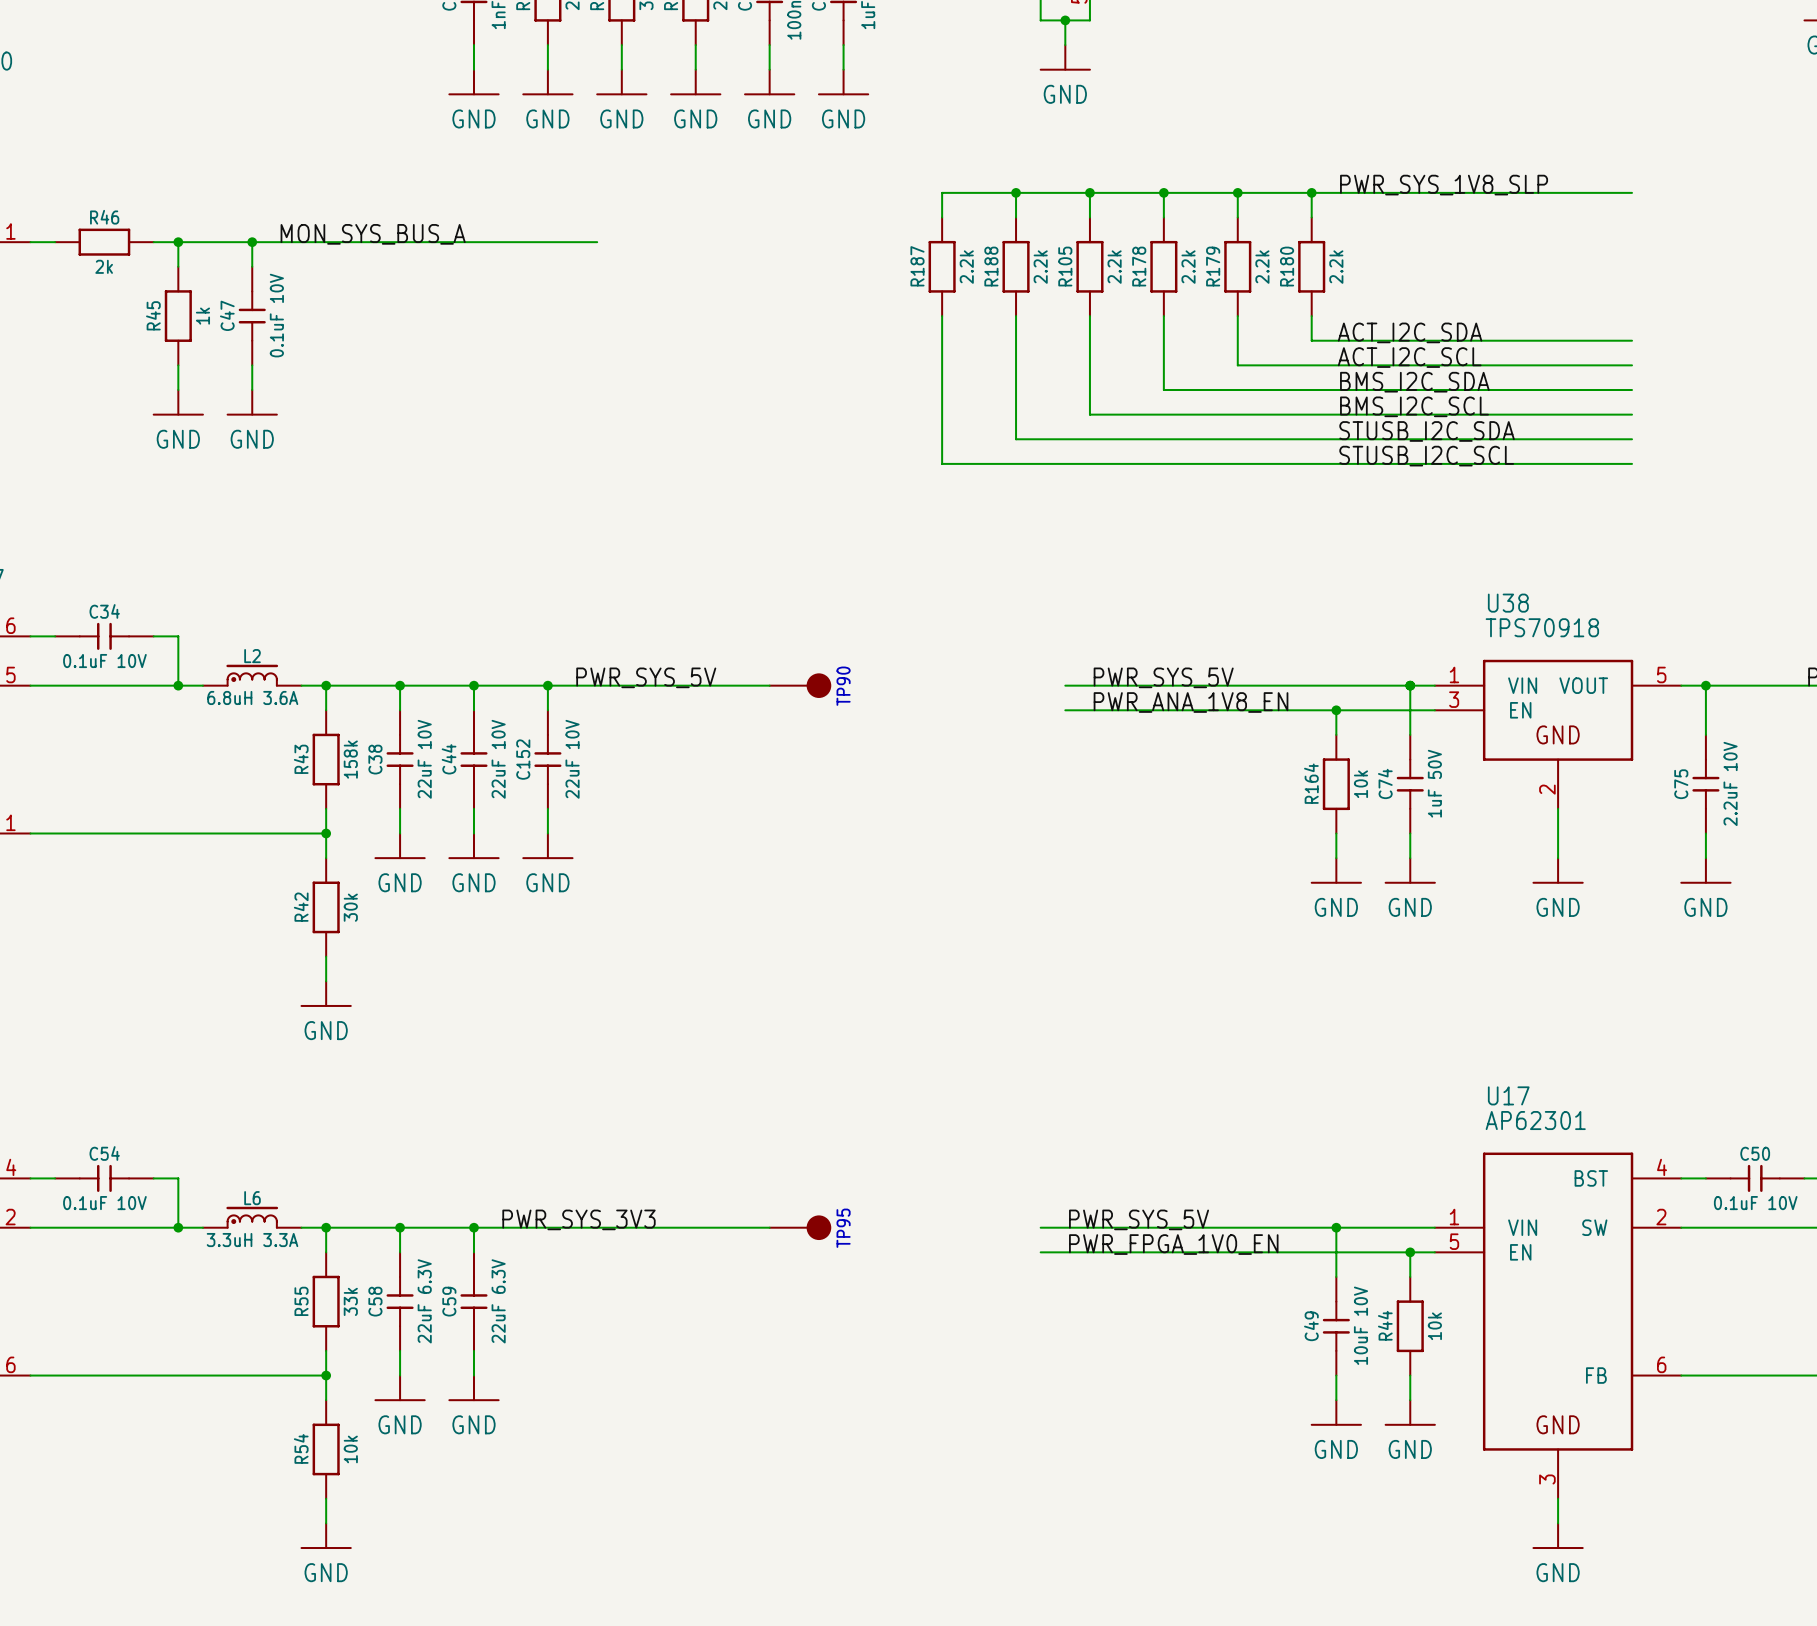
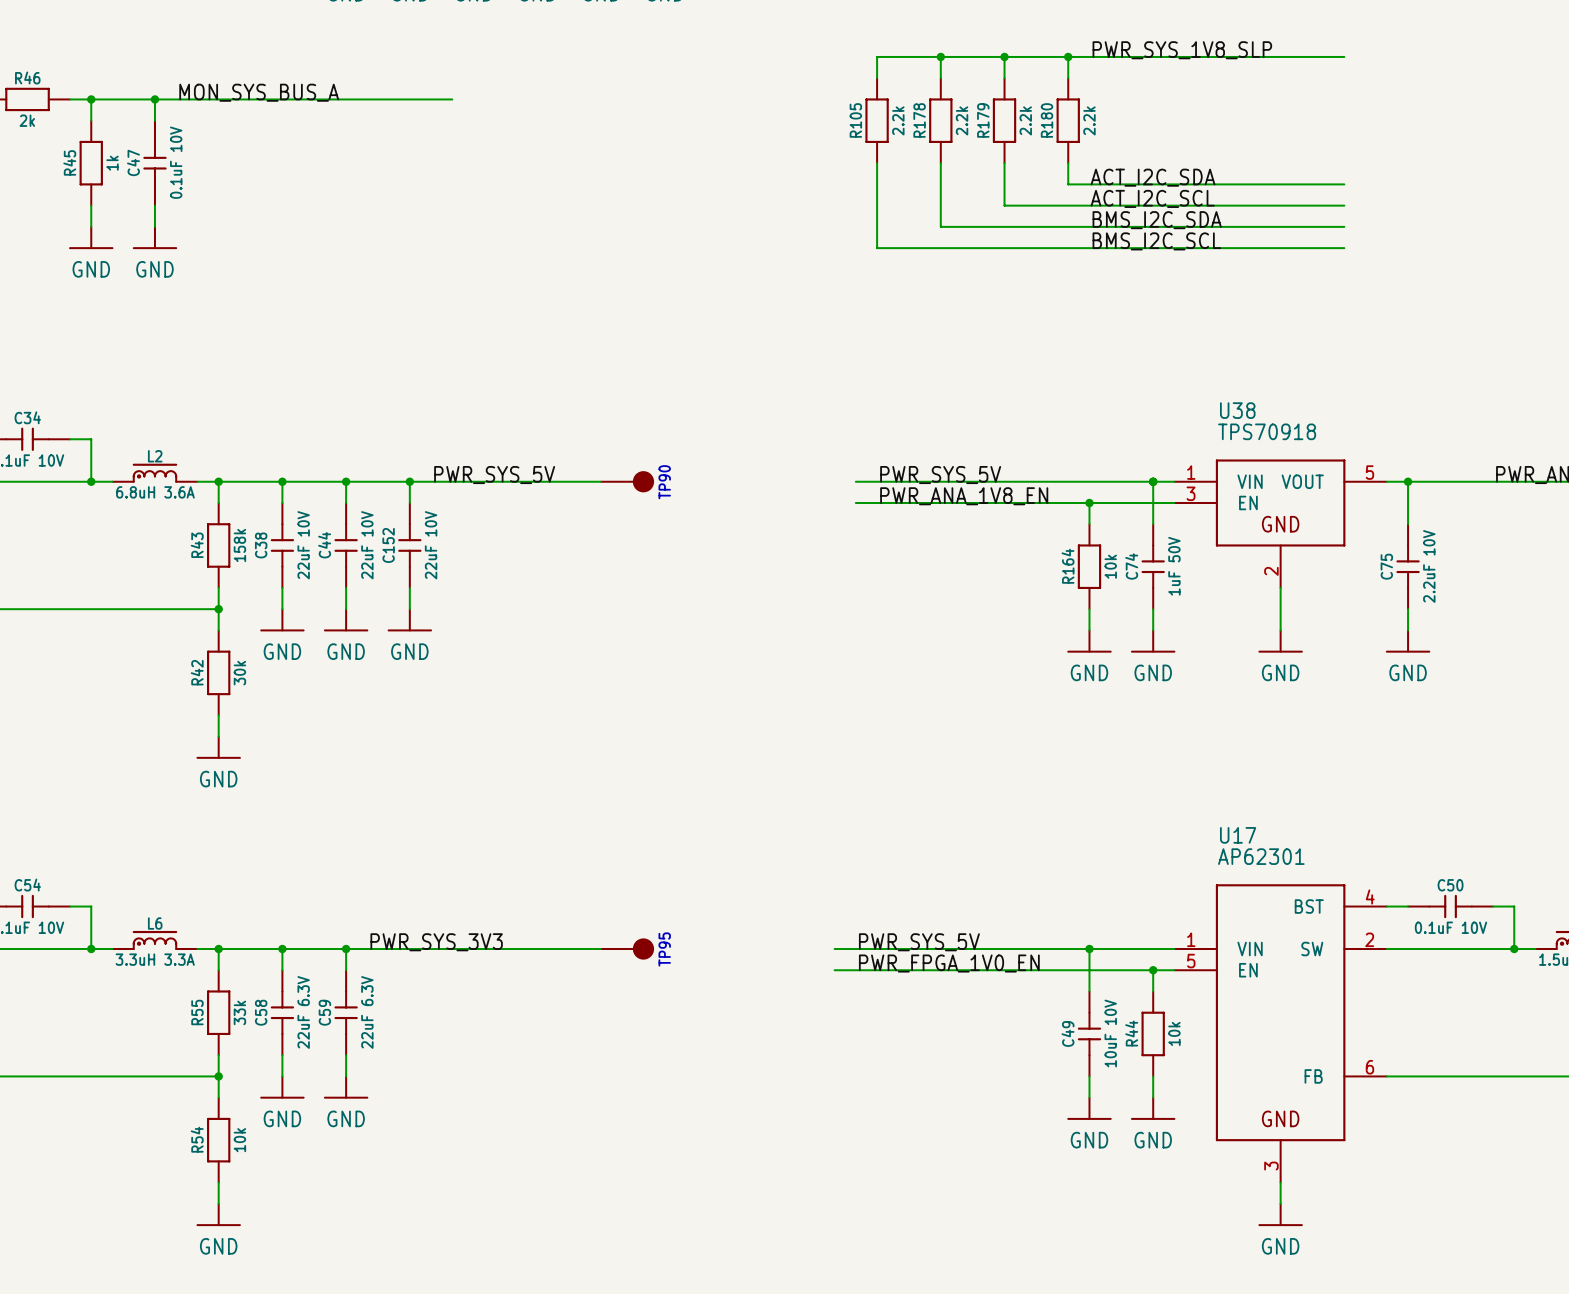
wire: (1016, 192) (1016, 217) -> none
junction: (1016, 192) -> none
wire: (1089, 192) (942, 192) (942, 217) -> none
junction: (1089, 192) -> none
R187: 2.2k (942, 266) -> none
R188: 2.2k (1016, 266) -> none
wire: (942, 316) (942, 463) (1632, 463) -> none
wire: (1016, 316) (1016, 439) (1632, 439) -> none
label: STUSB_I2C_SDA (1427, 431) -> none
label: STUSB_I2C_SCL (1426, 456) -> none

